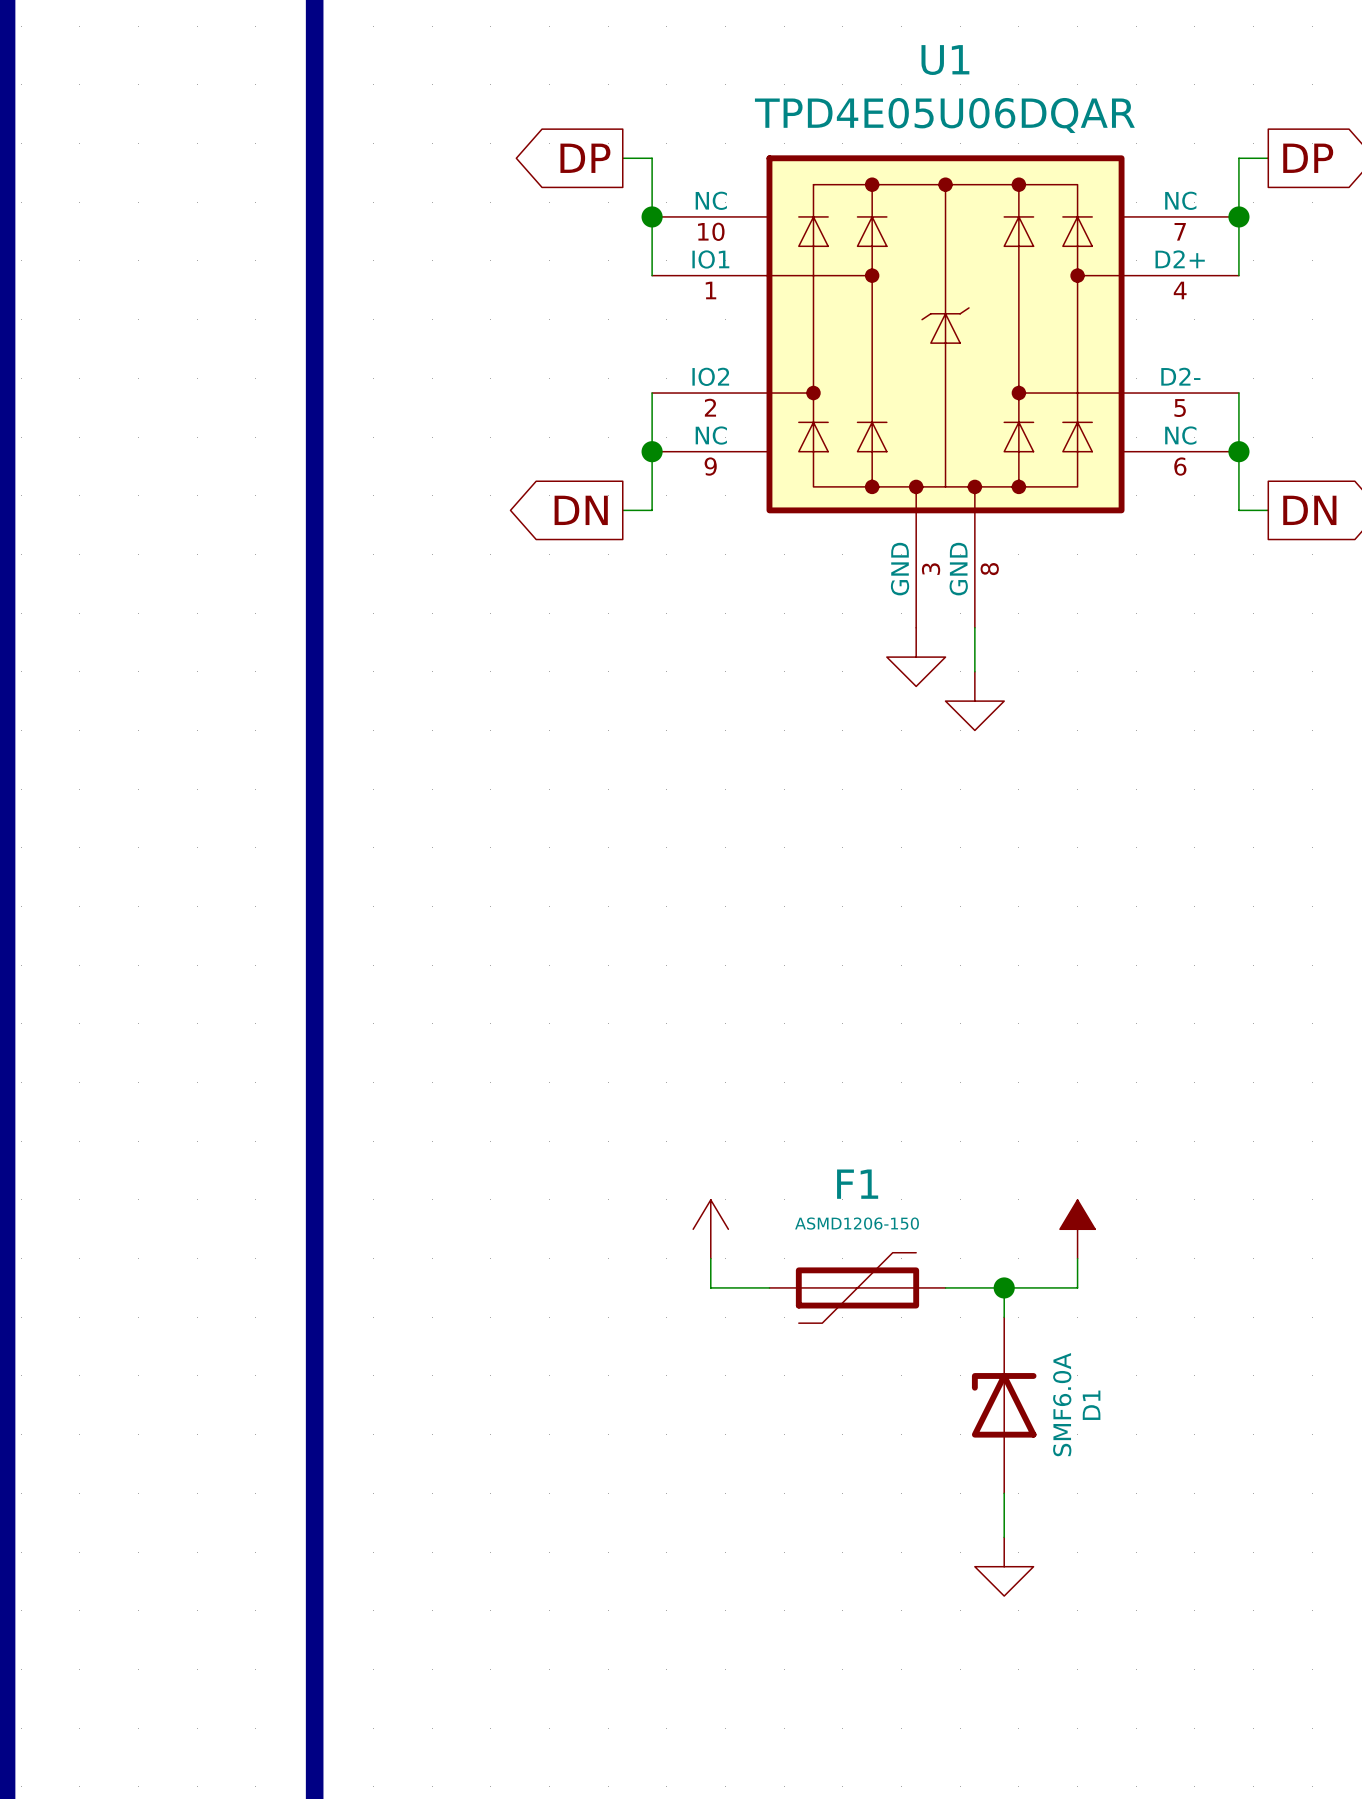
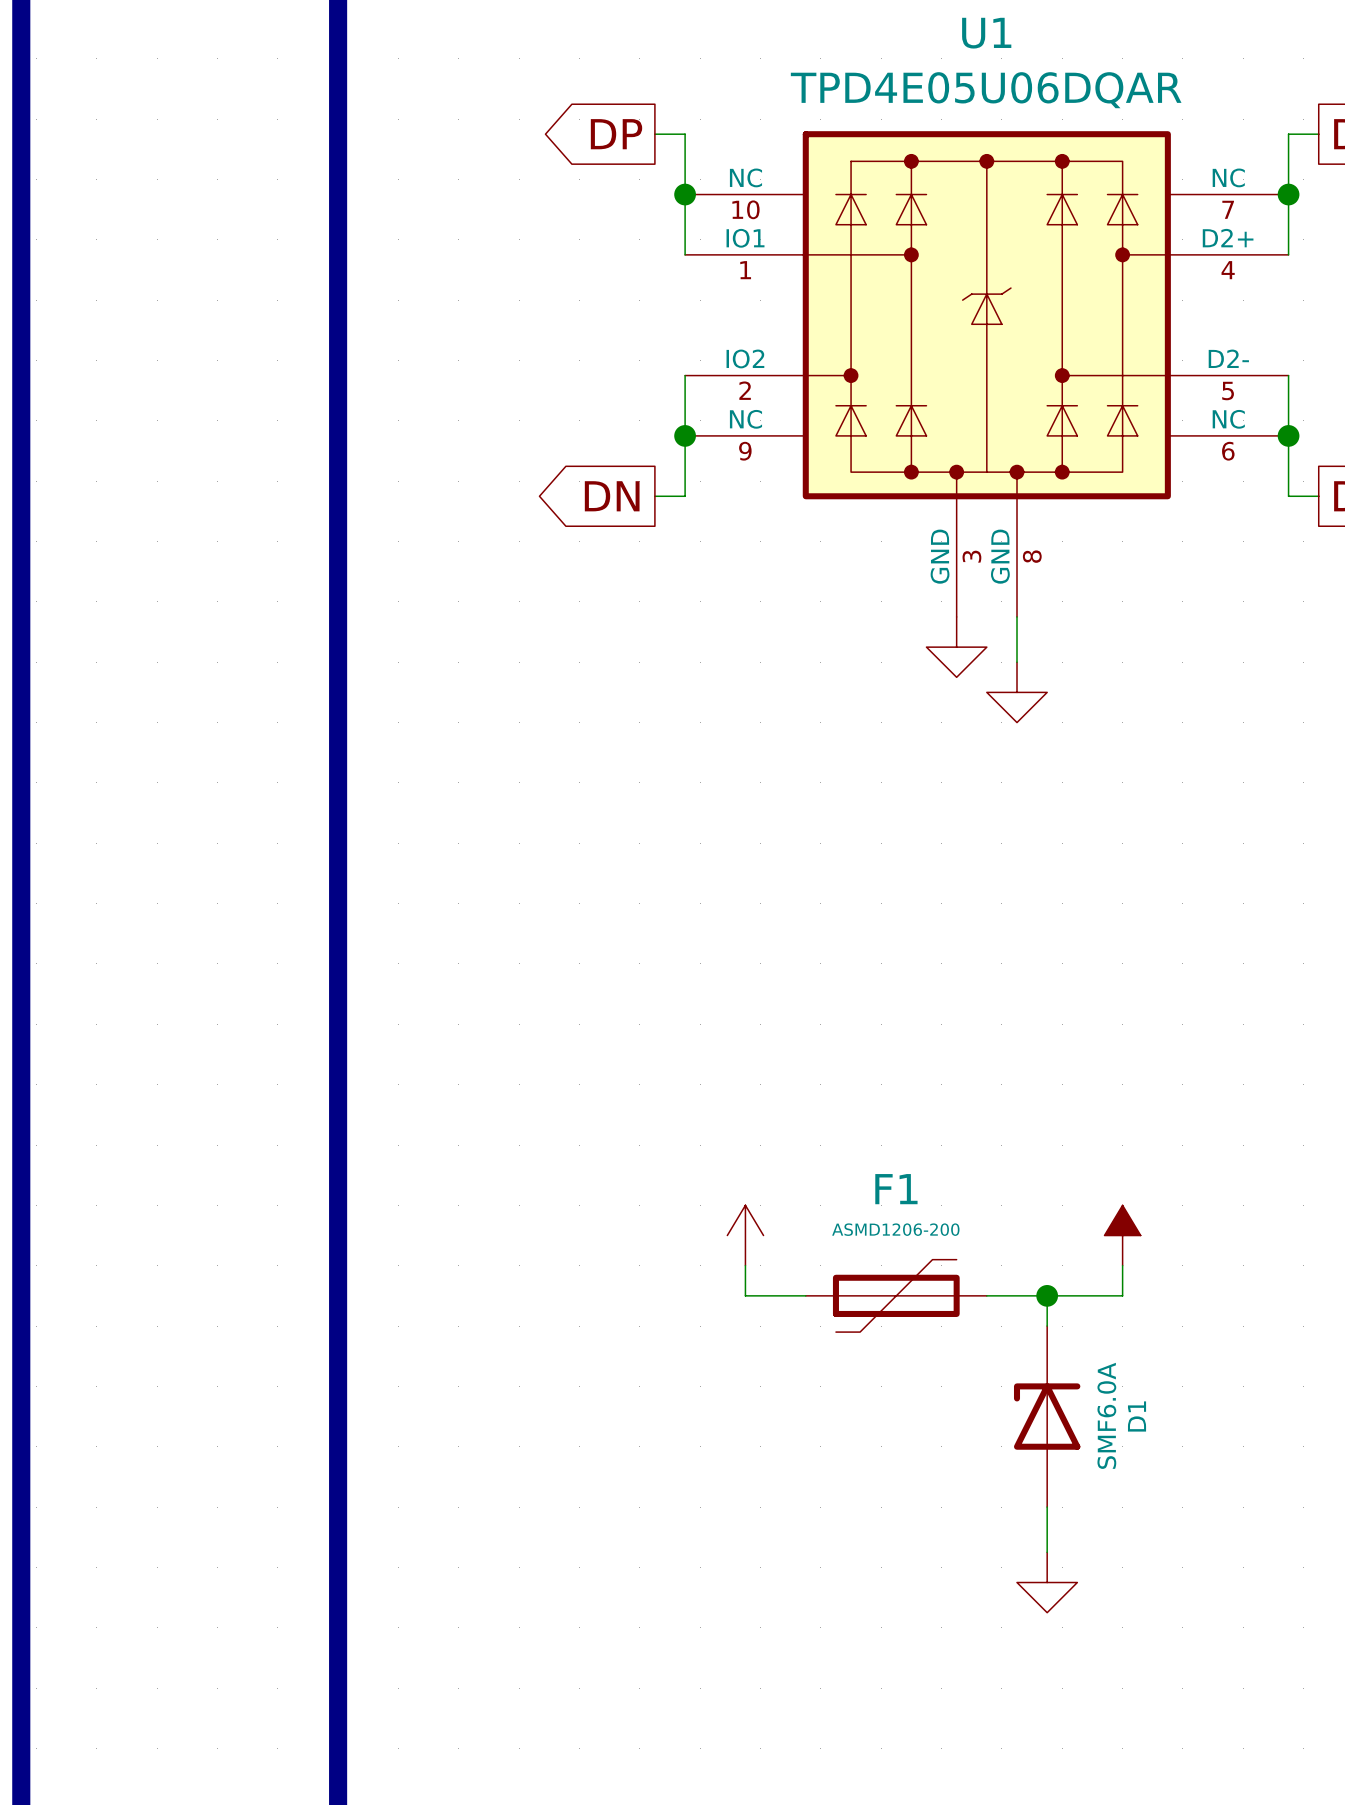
F1 value: ASMD1206-150 (857, 1223) -> ASMD1206-200 (895, 1229)

